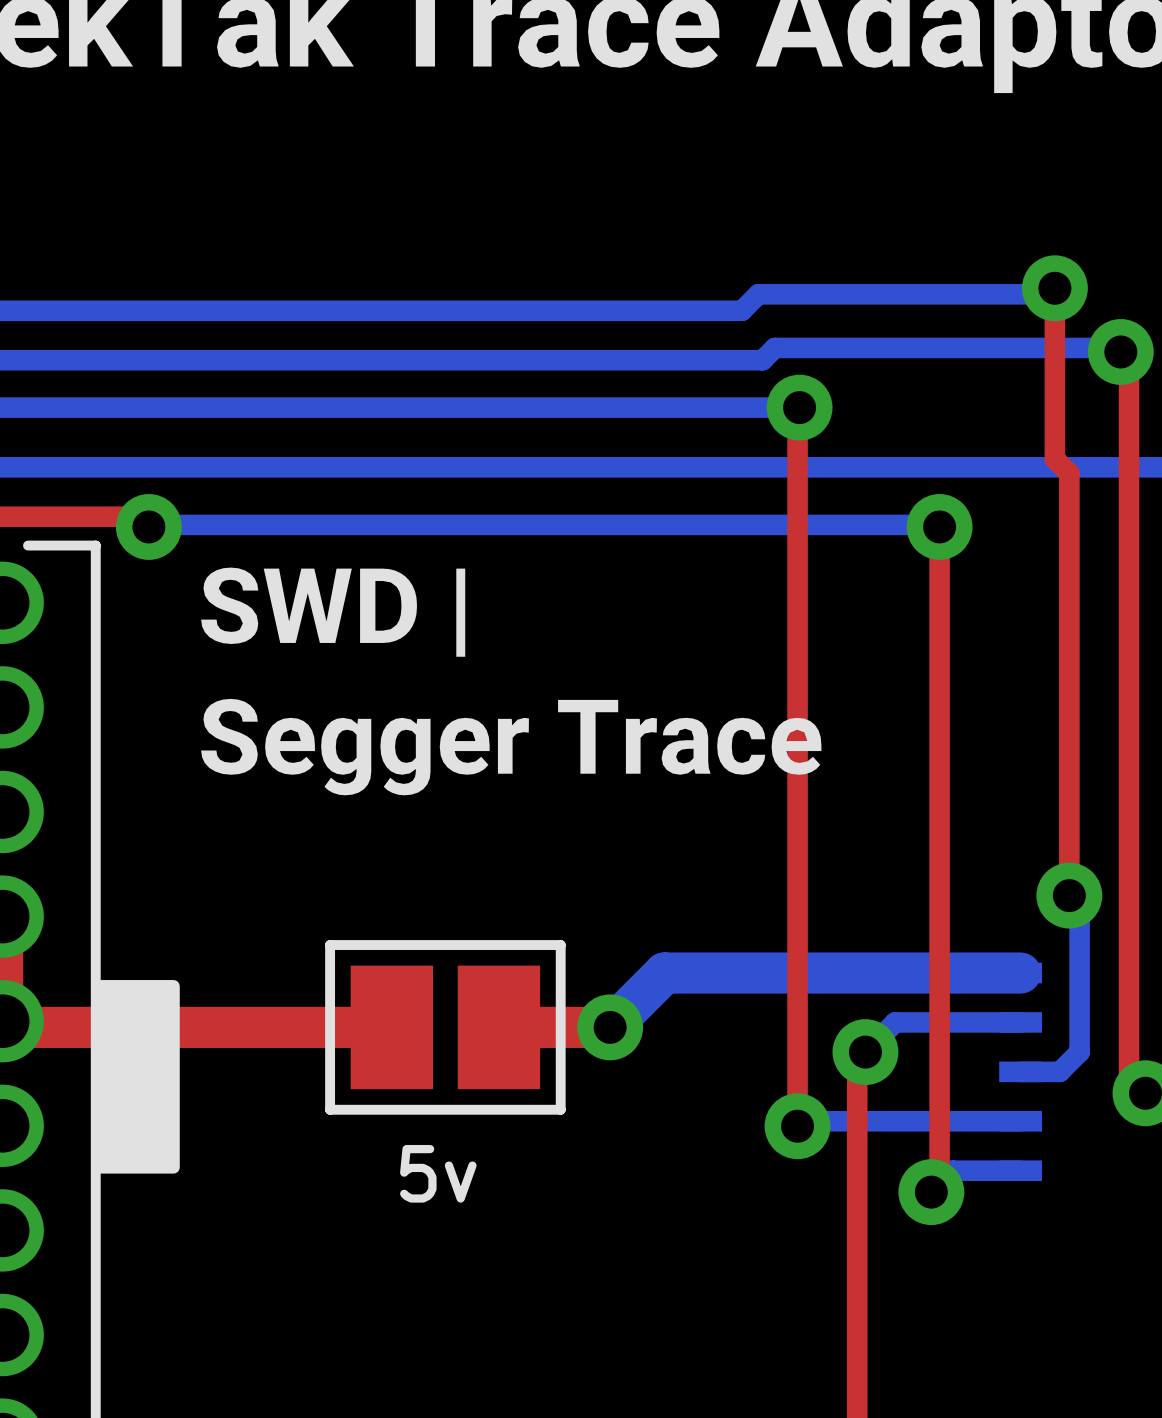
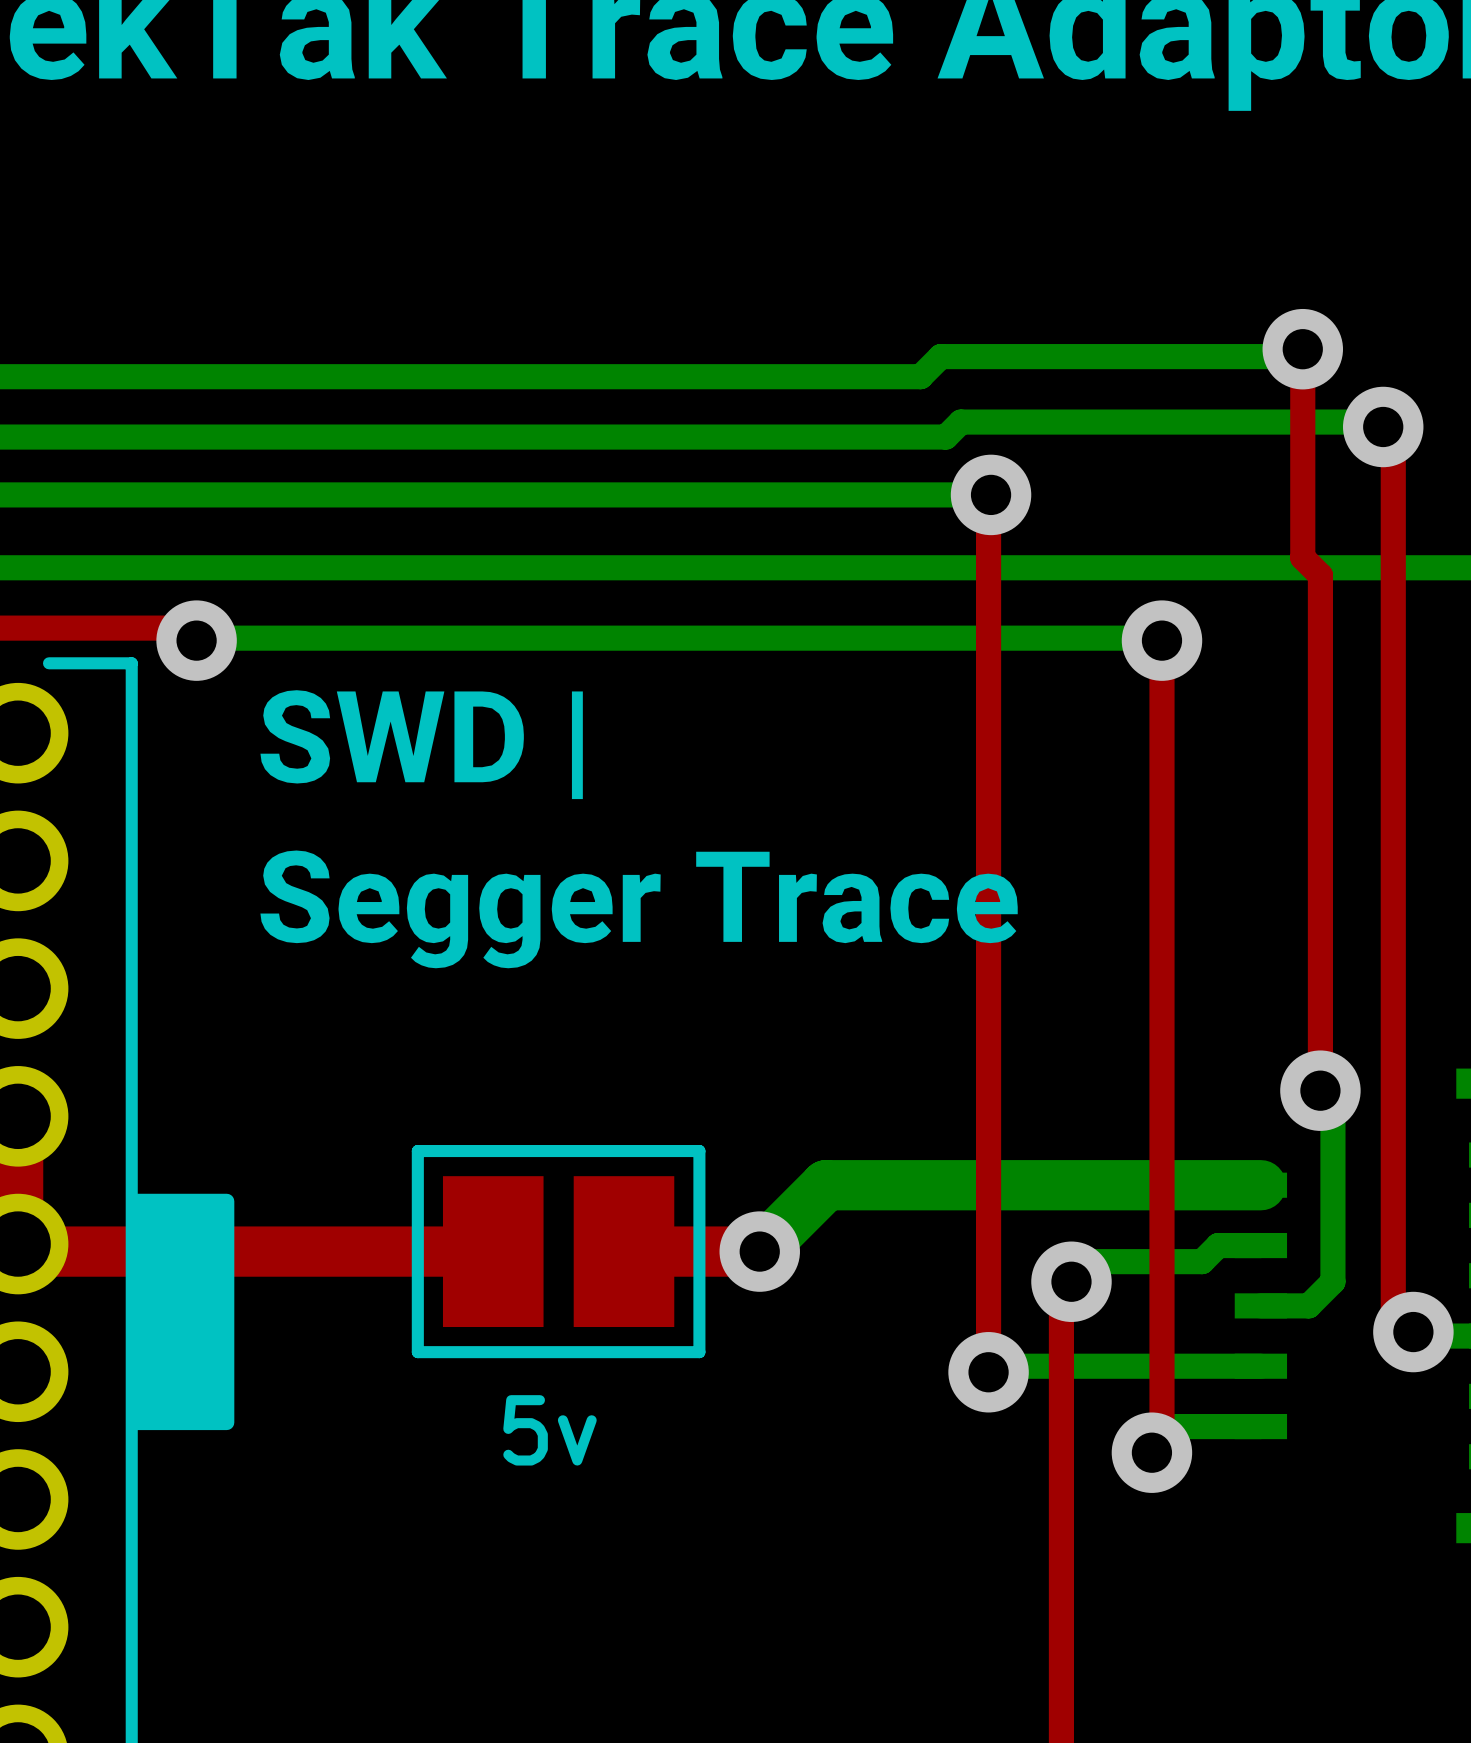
bottom track: (985, 1022) (895, 1022) (881, 1035) -> (1218, 1245) (1202, 1261) (1091, 1261)

